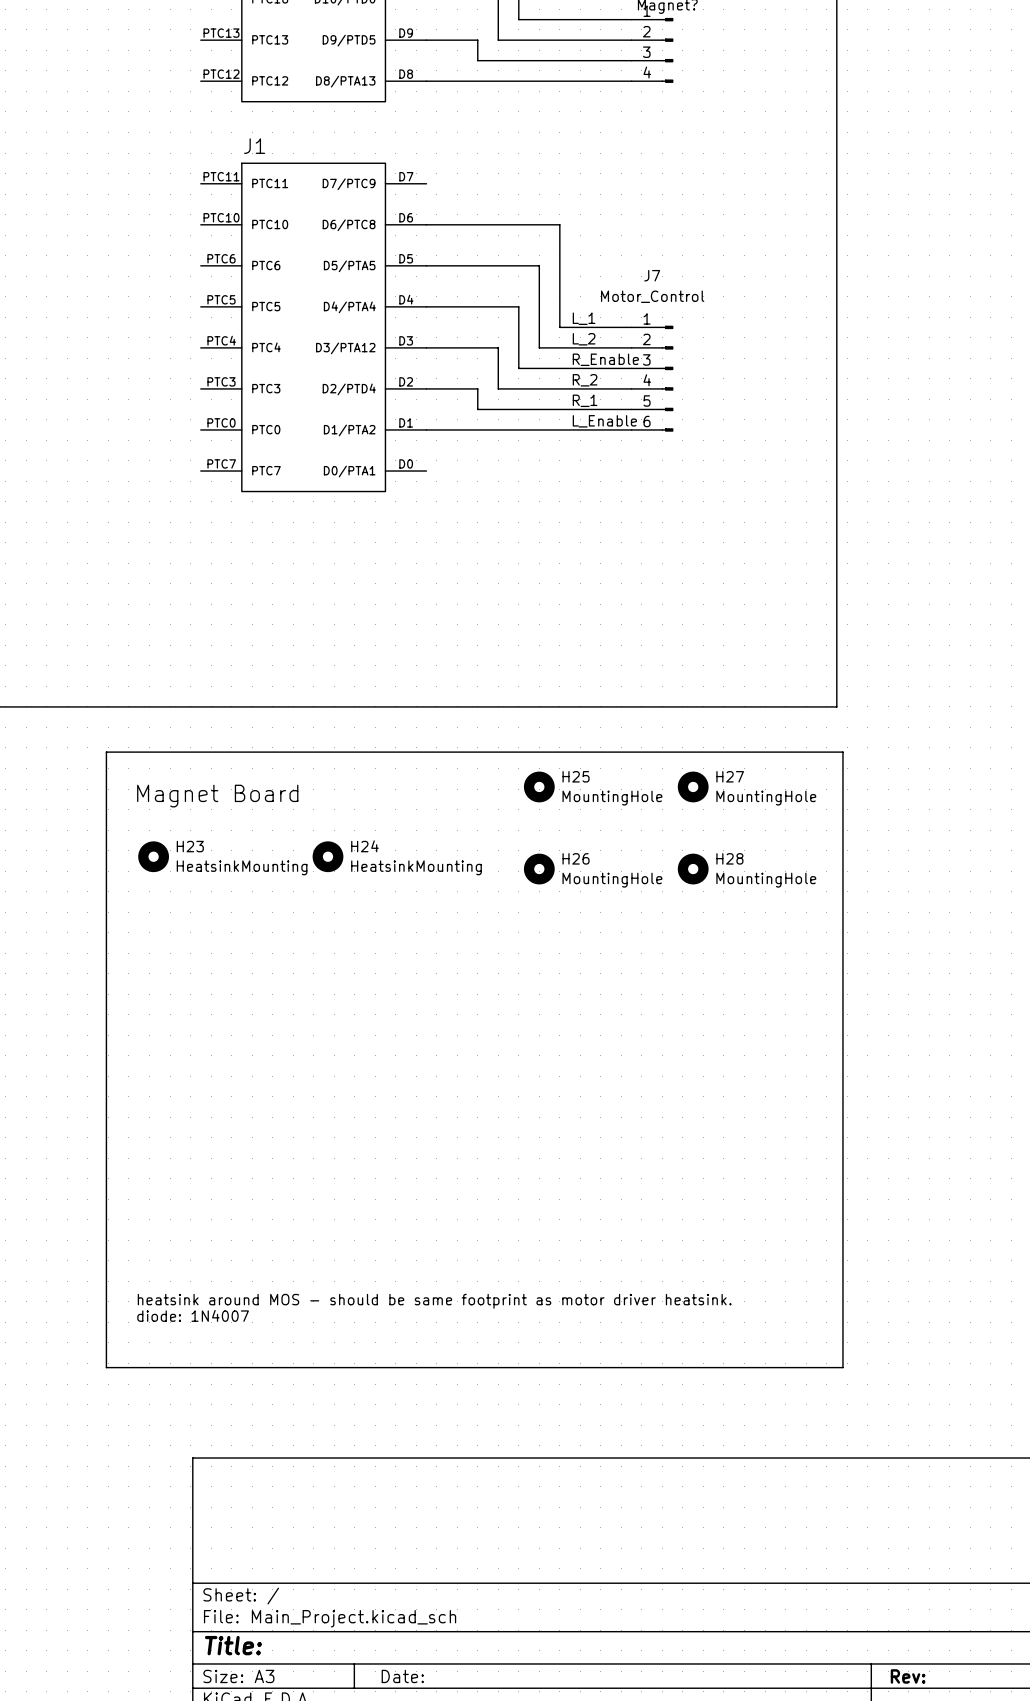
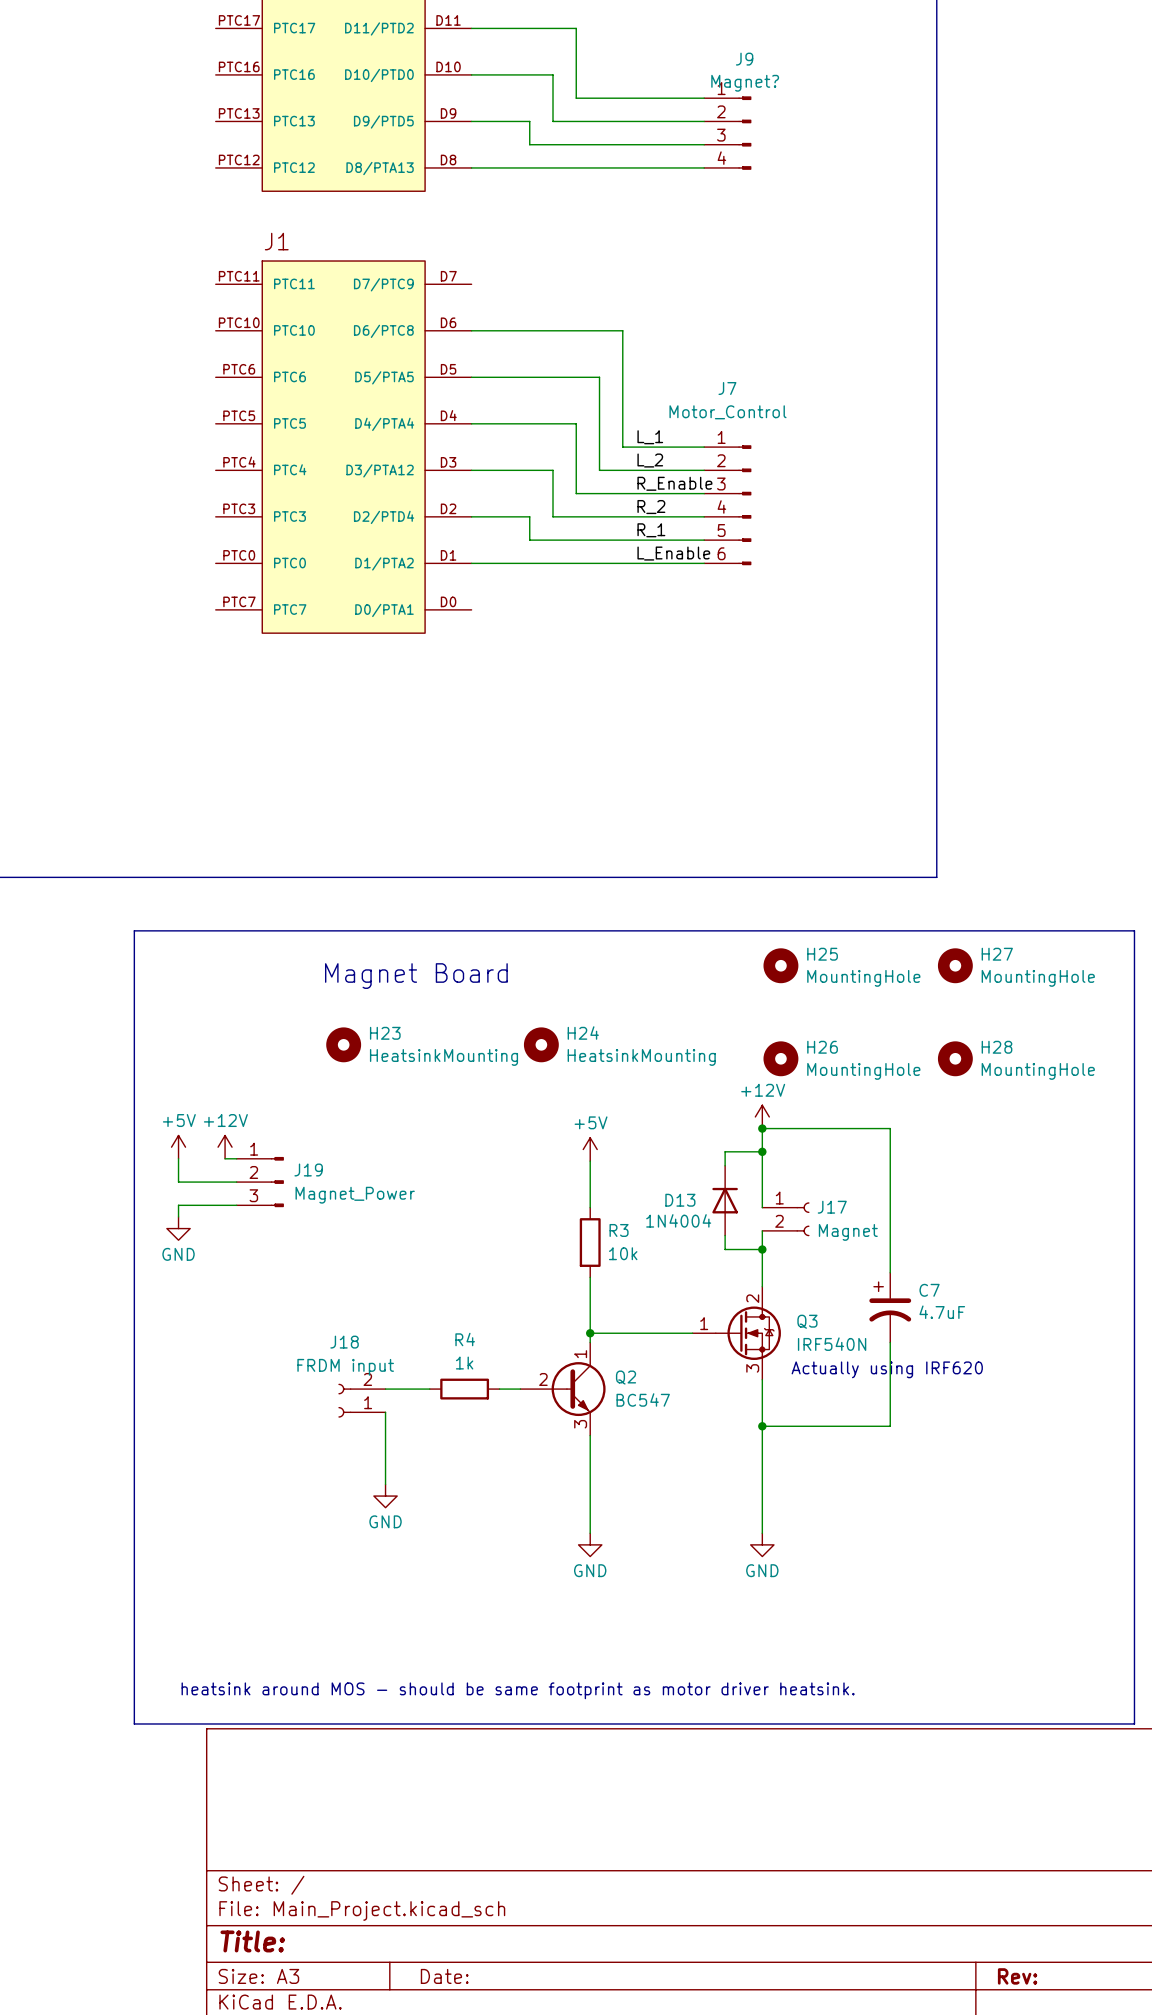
line: (106, 752) (842, 752) (842, 1367) (106, 1367) (106, 752) -> (134, 930) (134, 1723) (1134, 1723) (1134, 930) (134, 930)
H25 position: (539, 786) -> (780, 965)
H27 position: (693, 786) -> (955, 965)
text position: Magnet Board (217, 796) -> Magnet Board (416, 976)
H23 position: (153, 856) -> (343, 1044)
H24 position: (328, 856) -> (541, 1044)
H26 position: (539, 869) -> (780, 1058)
H28 position: (693, 869) -> (955, 1058)
power symbol: none -> +12V (762, 1116)
junction: none -> (762, 1128)
power symbol: none -> +5V (178, 1147)
power symbol: none -> +12V (225, 1147)
power symbol: none -> +5V (590, 1149)
wire: none -> (762, 1151) (725, 1151) (725, 1165)
junction: none -> (762, 1151)
wire: none -> (178, 1158) (178, 1182) (236, 1182)
wire: none -> (225, 1158) (236, 1158)
wire: none -> (590, 1161) (590, 1207)
J19: none -> Magnet_Power (260, 1182)
D13: none -> 1N4004 (725, 1200)
wire: none -> (236, 1205) (178, 1205) (178, 1216)
wire: none -> (762, 1207) (762, 1128) (890, 1128) (890, 1272)
J17: none -> Magnet (785, 1219)
power symbol: none -> GND (178, 1228)
wire: none -> (762, 1230) (762, 1286)
wire: none -> (725, 1235) (725, 1249) (762, 1249)
R3: none -> 10k (590, 1242)
junction: none -> (762, 1249)
wire: none -> (590, 1277) (590, 1342)
C7: none -> 4.7uF (890, 1307)
wire: none -> (590, 1333) (692, 1333)
junction: none -> (590, 1333)
Q3: none -> IRF540N (736, 1333)
wire: none -> (890, 1342) (890, 1426) (762, 1426)
text: none -> Actually using IRF620 (887, 1369)
wire: none -> (762, 1379) (762, 1533)
wire: none -> (385, 1389) (429, 1389)
R4: none -> 1k (464, 1389)
wire: none -> (499, 1389) (520, 1389)
Q2: none -> BC547 (563, 1389)
J18: none -> FRDM input (361, 1400)
wire: none -> (385, 1412) (385, 1484)
junction: none -> (762, 1426)
wire: none -> (590, 1435) (590, 1533)
power symbol: none -> GND (385, 1496)
power symbol: none -> GND (590, 1544)
power symbol: none -> GND (762, 1544)
text position: heatsink around MOS - should be same footprint as motor driver heatsink. (434, 1301) -> heatsink around MOS - should be same footprint as motor driver heatsink. (518, 1690)
text: diode: 1N4007 (193, 1315) -> none

